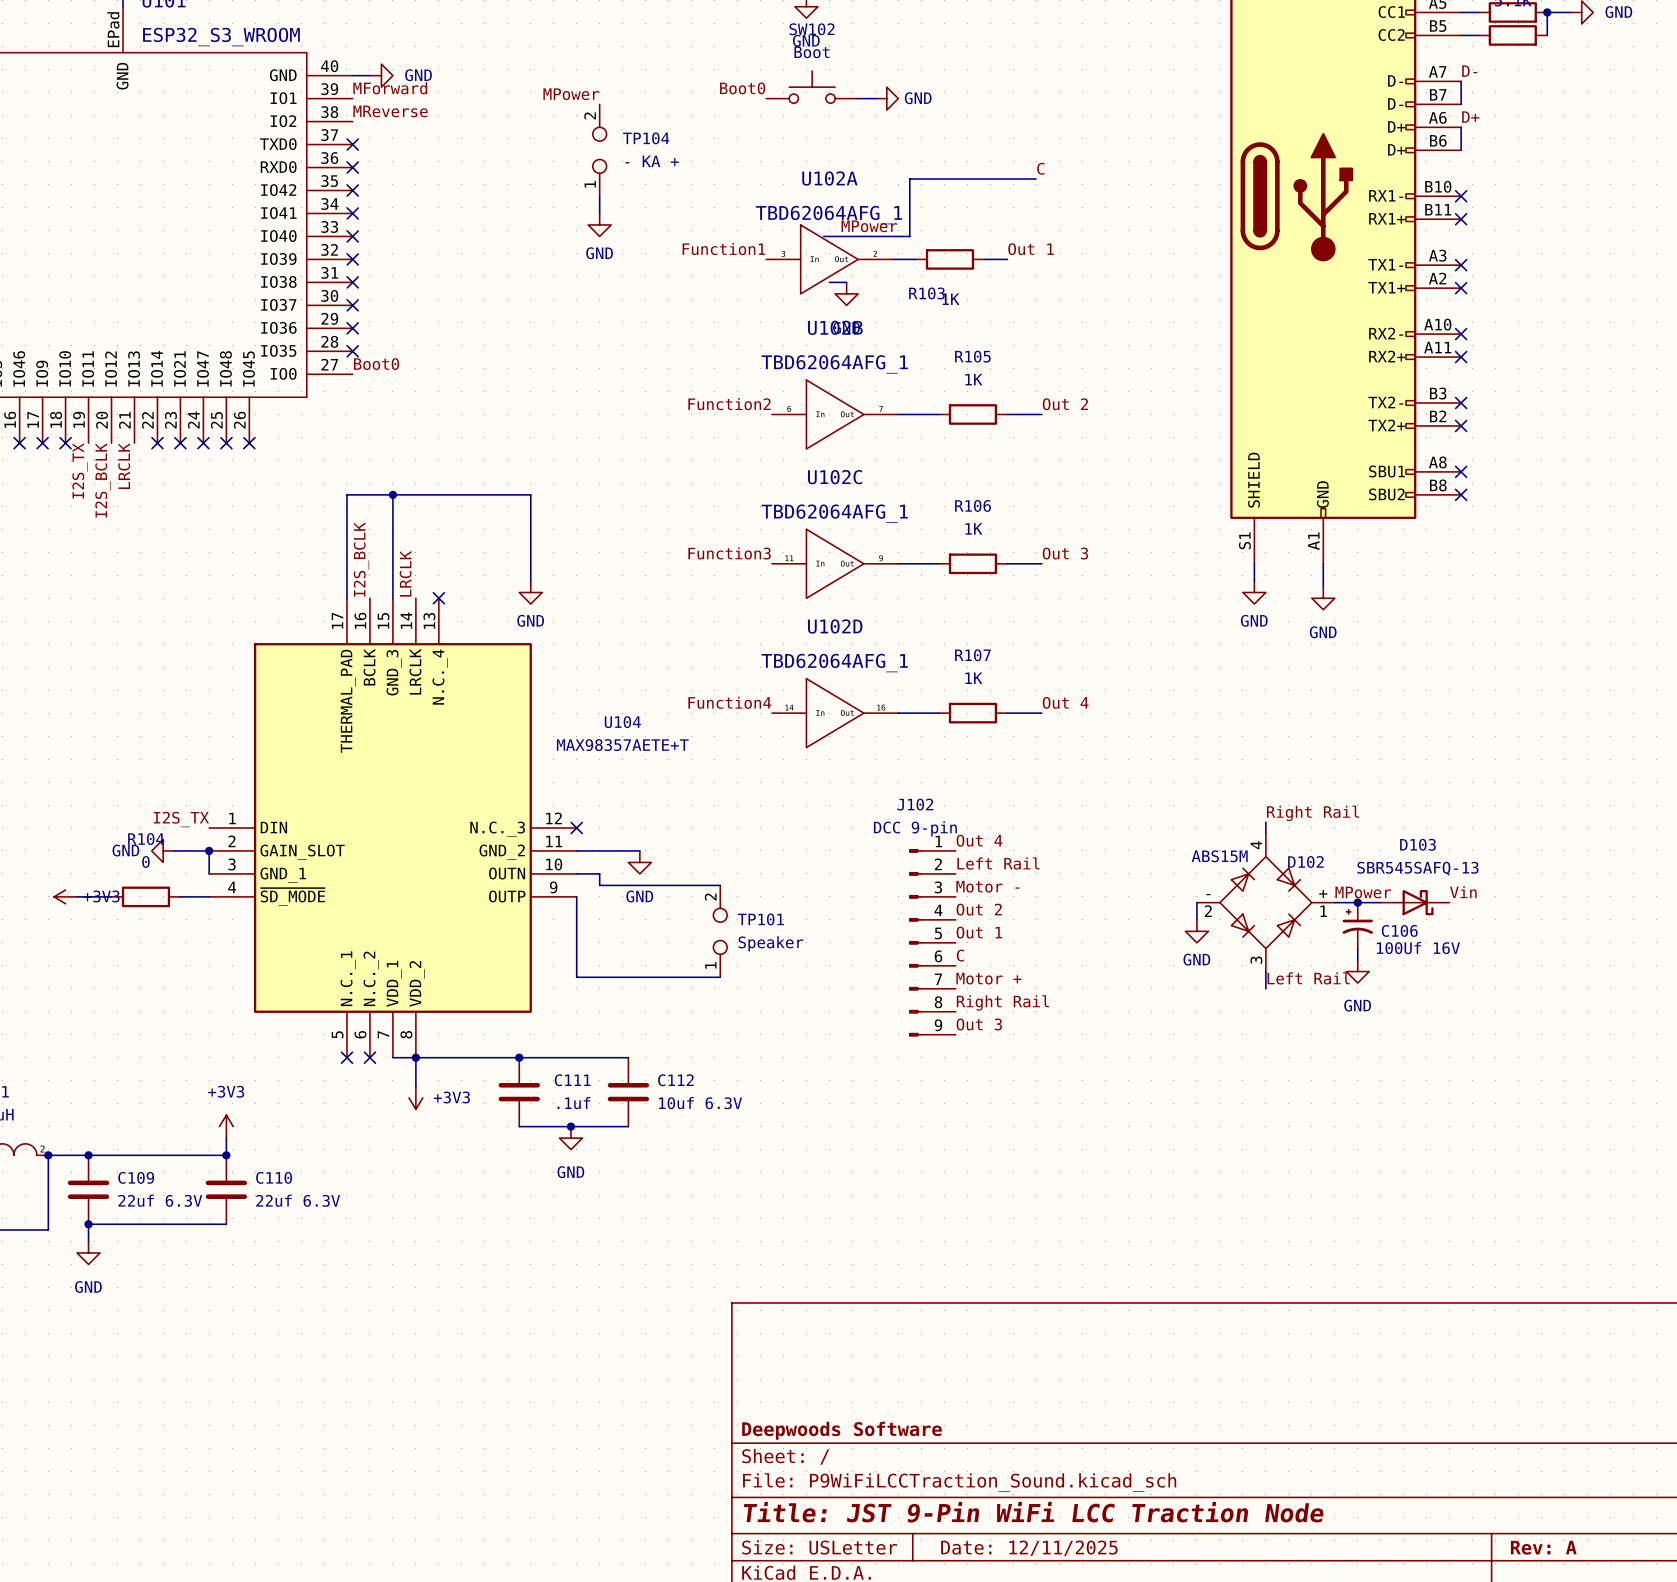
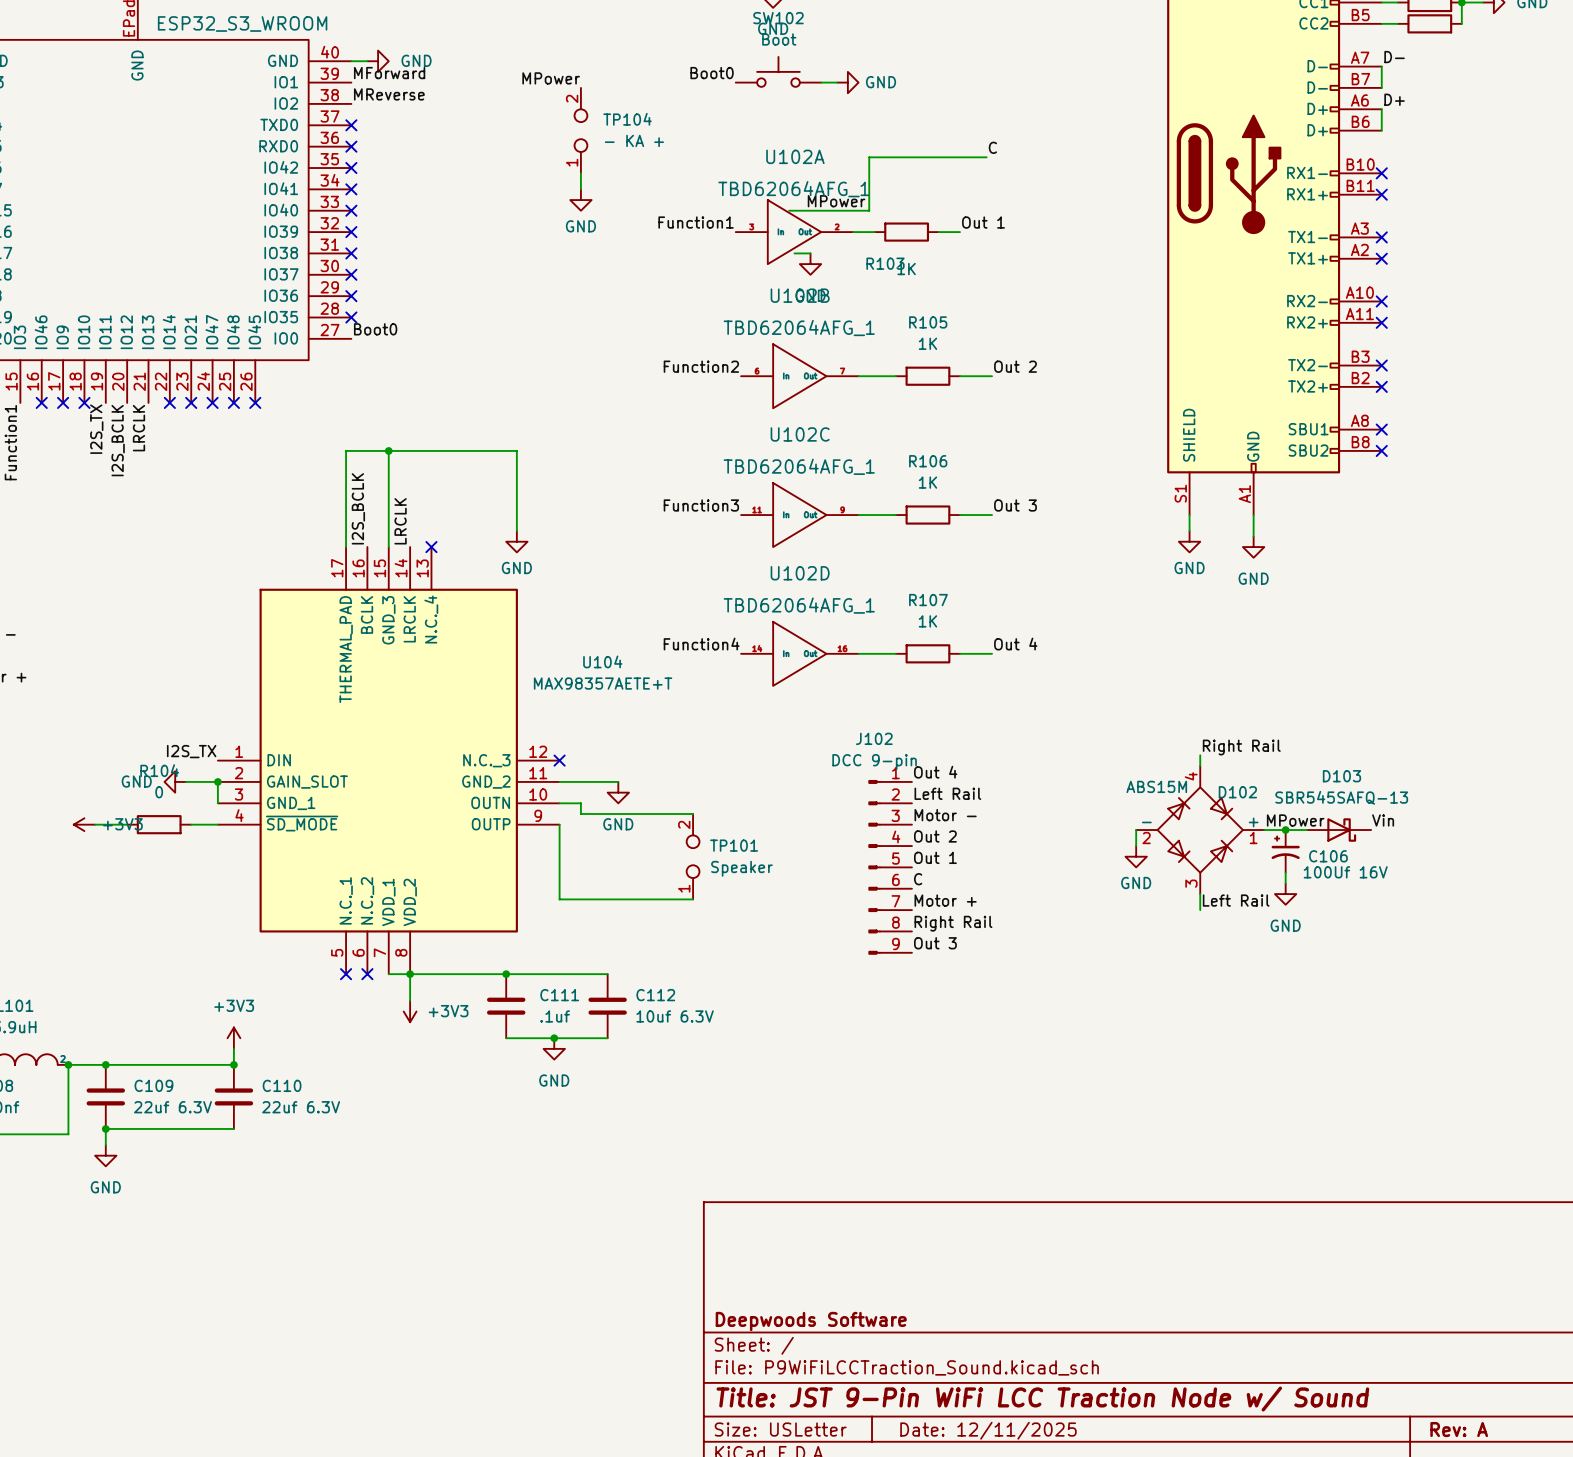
title block: Title: JST 9-Pin WiFi LCC Traction Node (1033, 1512) -> Title: JST 9-Pin WiFi LCC Traction Node w/ Sound (1042, 1399)

